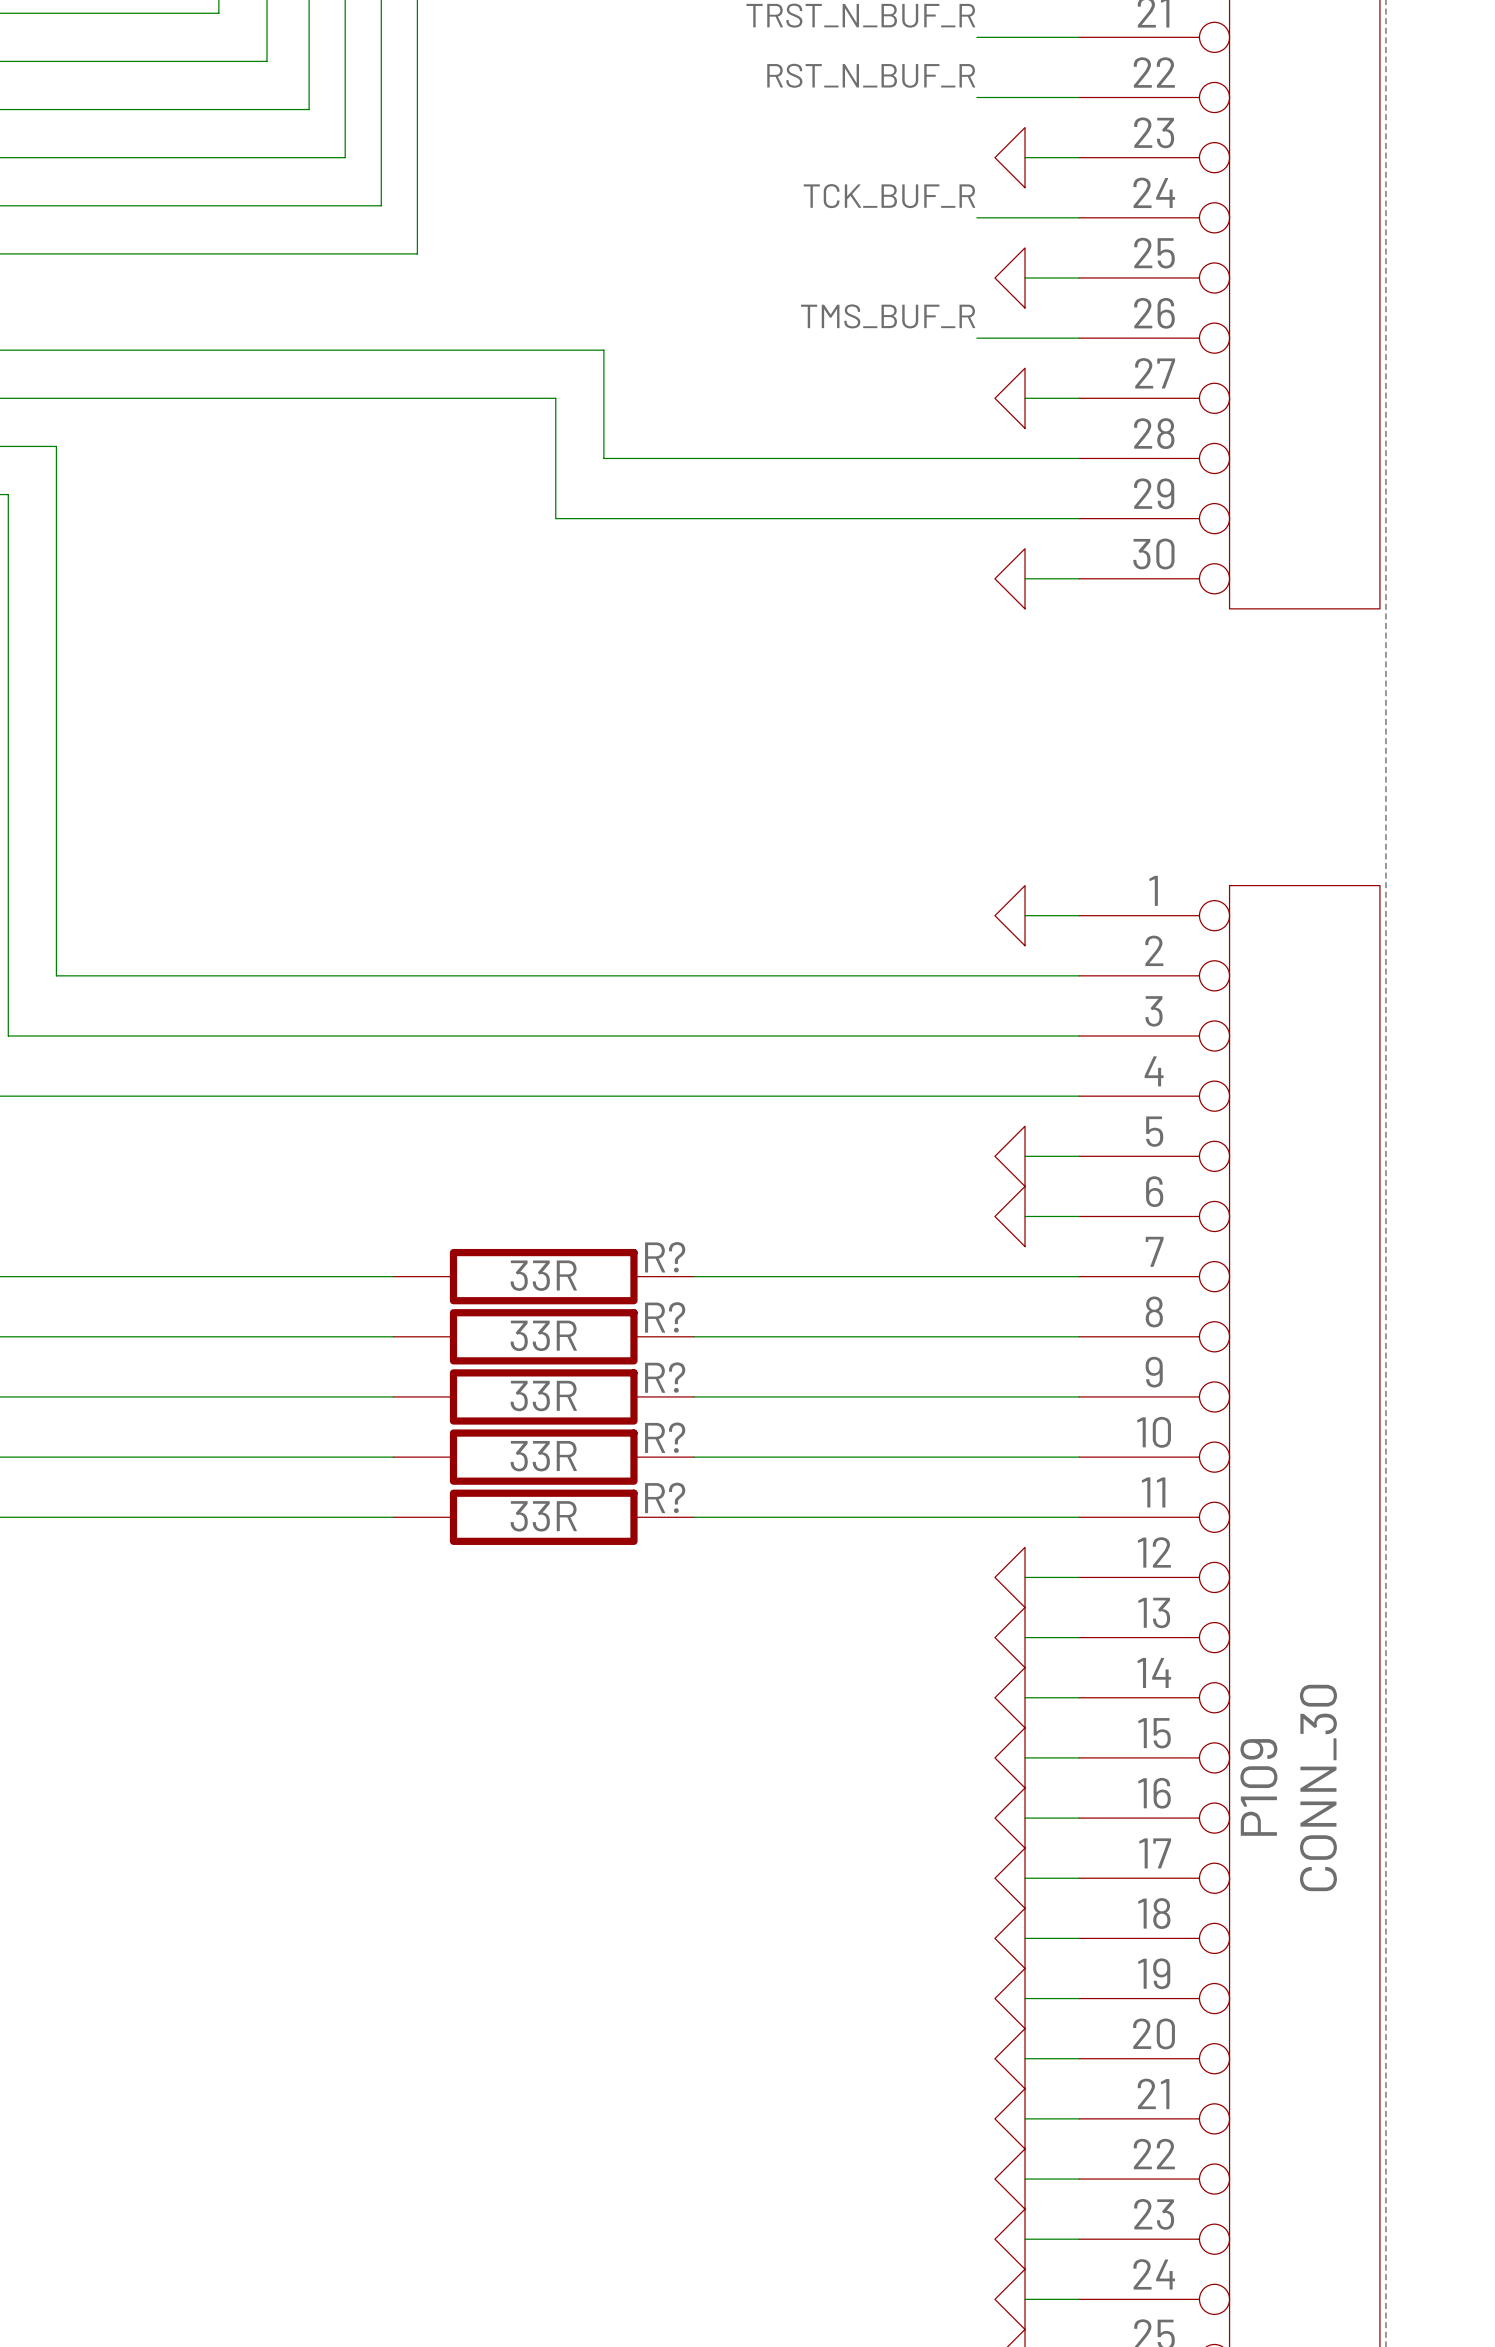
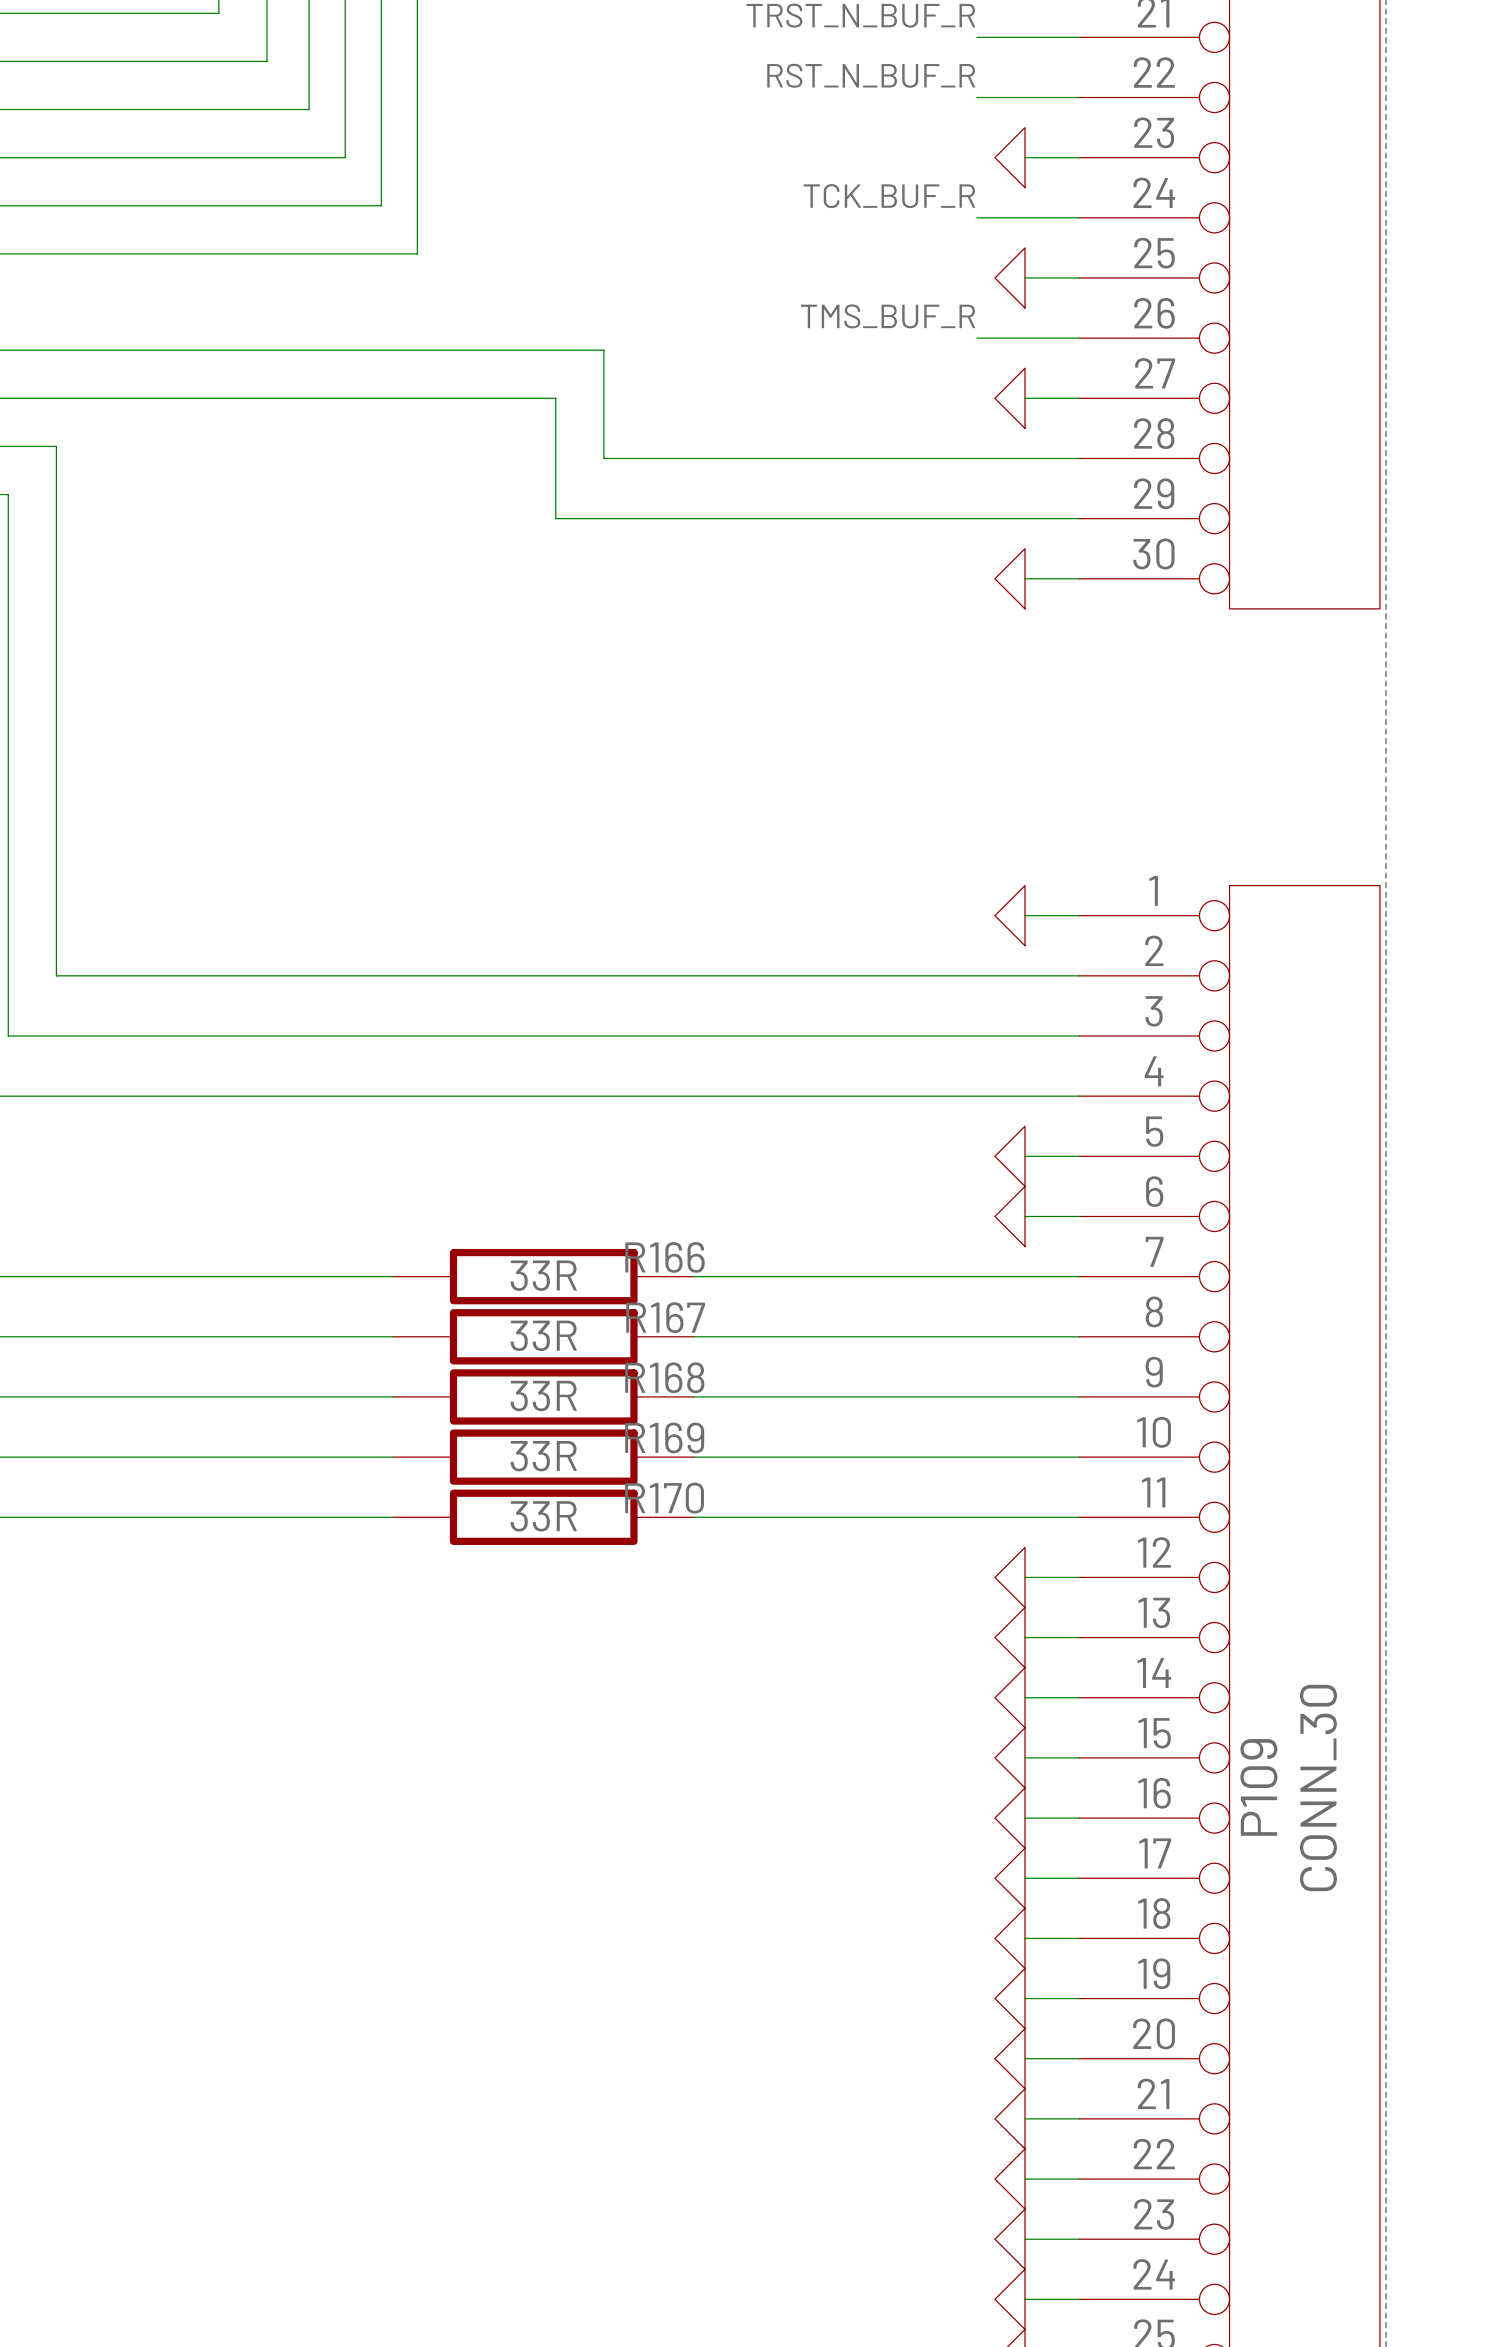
R? name: R? (665, 1257) -> R166 (664, 1257)
R? name: R? (665, 1317) -> R167 (665, 1317)
R? name: R? (665, 1377) -> R168 (664, 1377)
R? name: R? (665, 1437) -> R169 (664, 1437)
R? name: R? (665, 1497) -> R170 (664, 1498)

